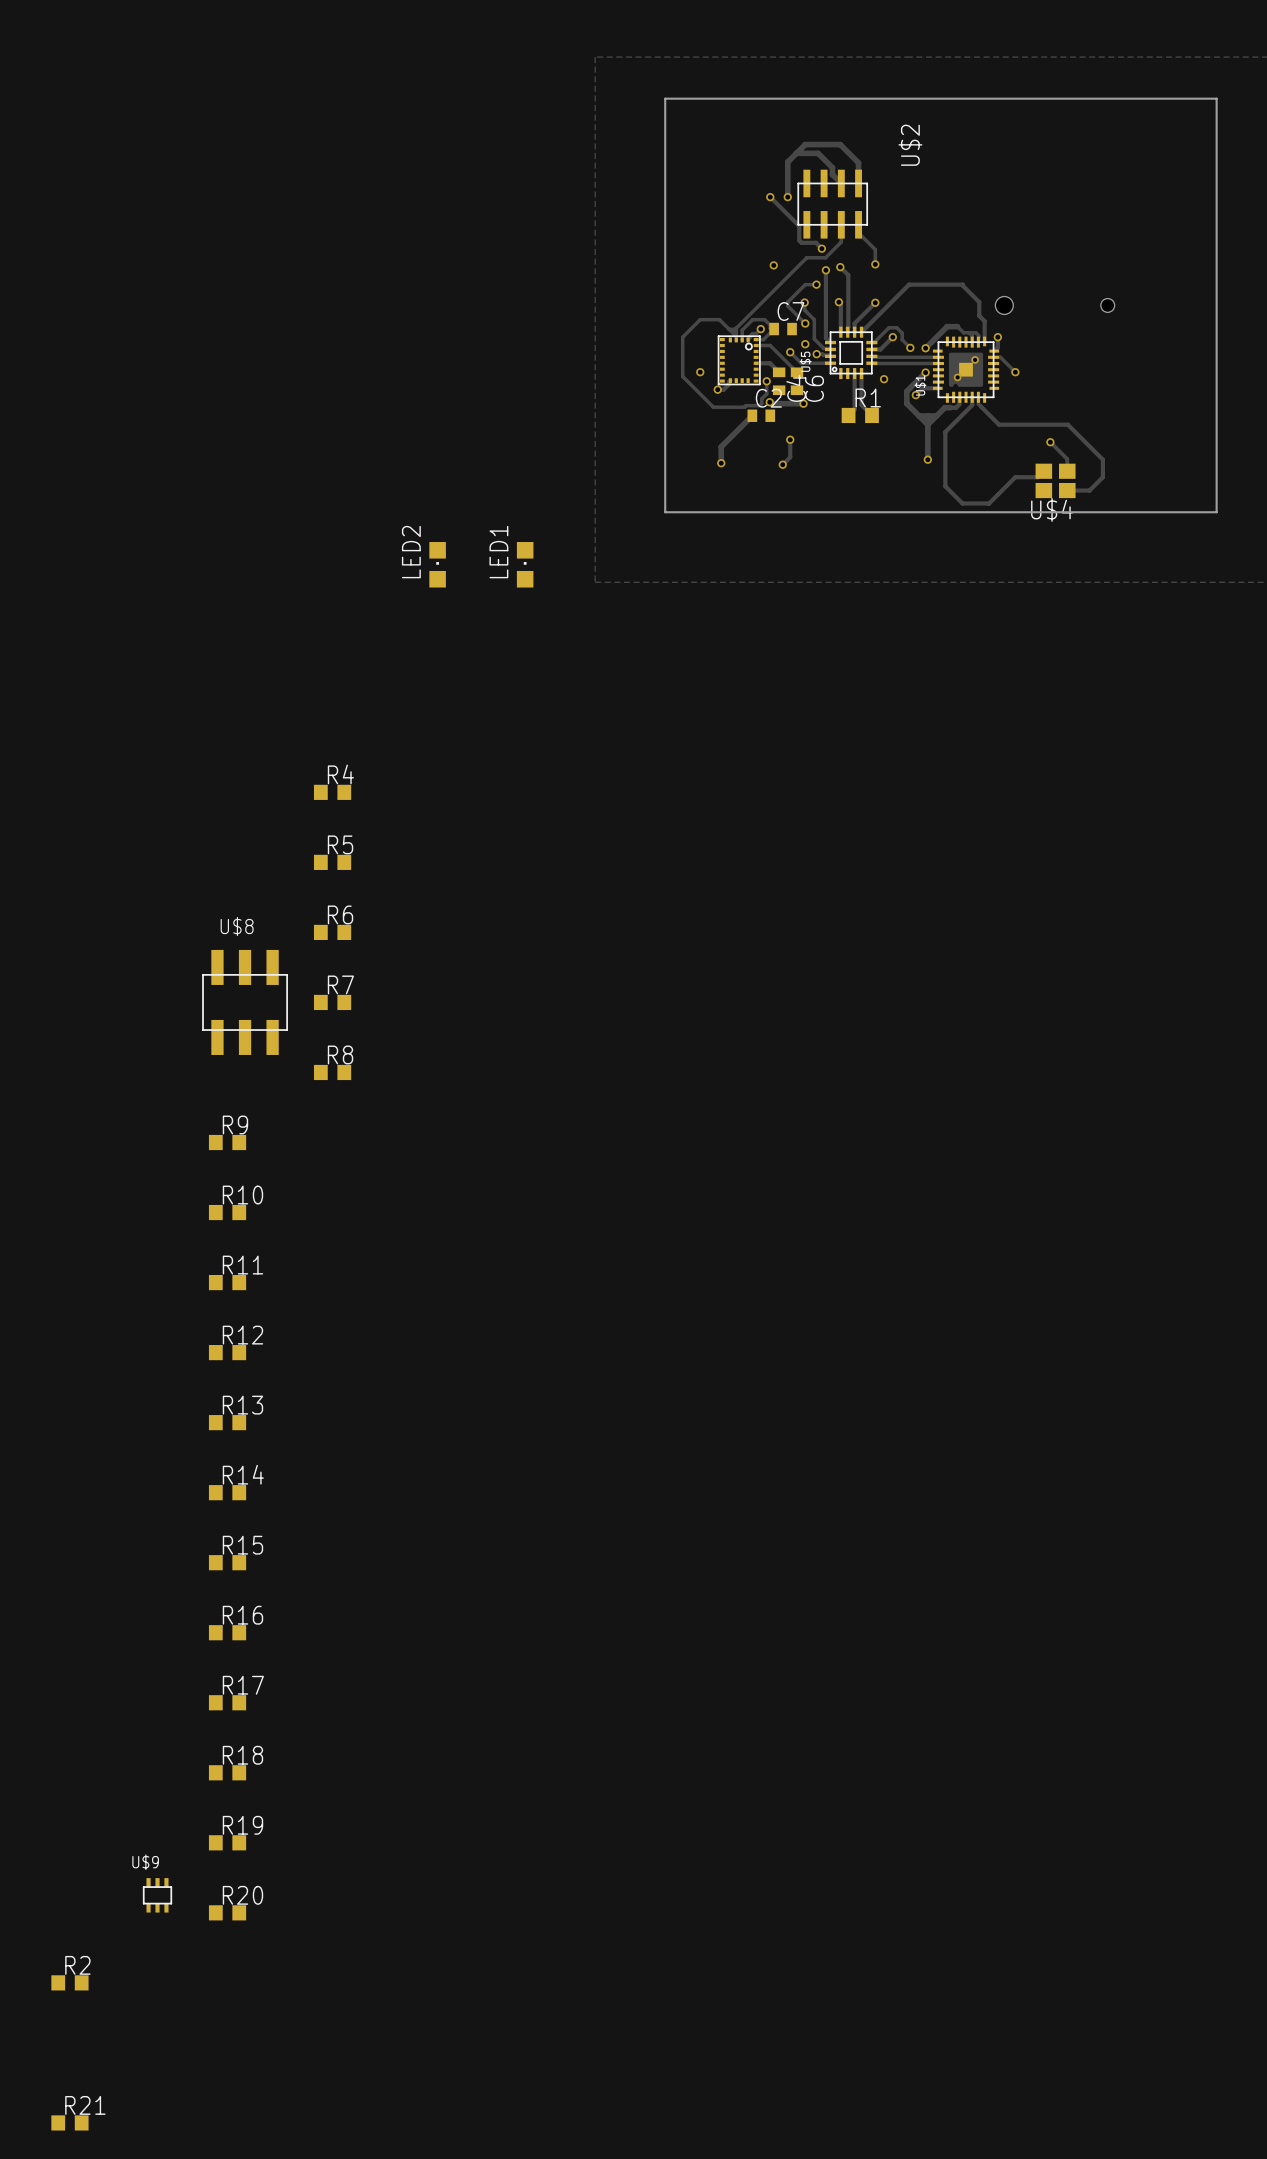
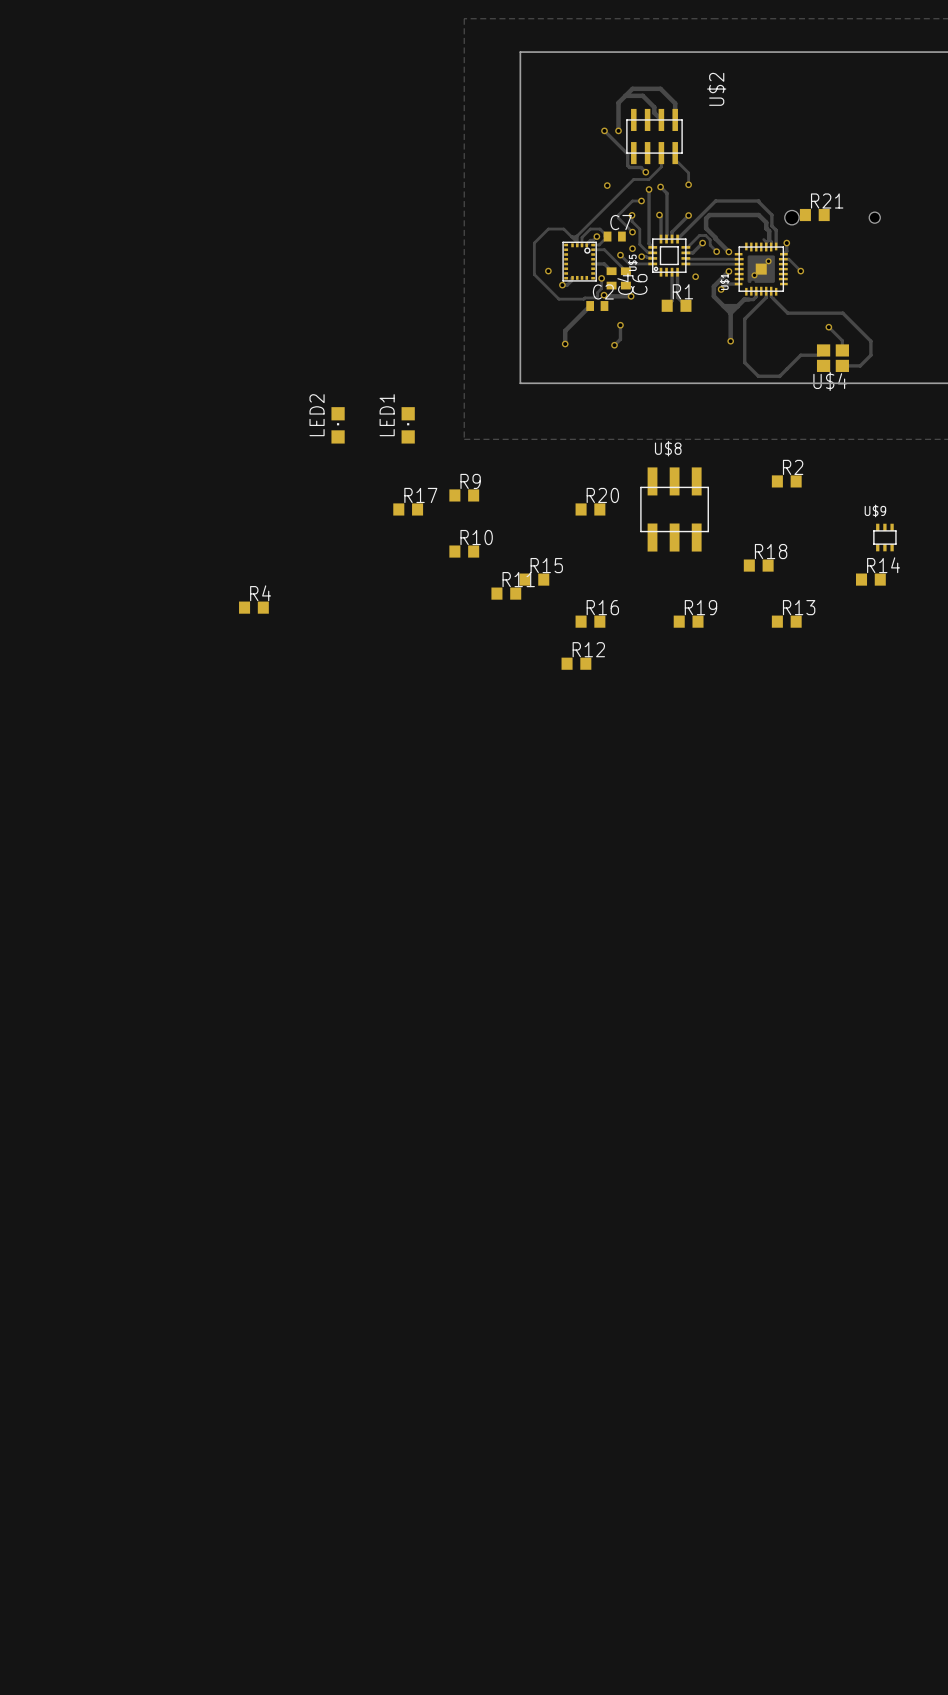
track: (957, 326) (947, 326) (925, 348) -> (766, 243) (769, 240) (769, 231) (766, 228) (766, 222) (758, 215) (709, 215) (706, 218) (706, 228) (728, 251)
track: (957, 326) (963, 332) (975, 332) -> none
R5: (332, 862) -> none
R6: (332, 932) -> none
U$8 position: (245, 1002) -> (674, 509)
R7: (332, 1002) -> none
R8: (332, 1072) -> none
R9 position: (227, 1142) -> (464, 495)
R10 position: (227, 1212) -> (464, 551)
R11 position: (227, 1282) -> (506, 593)
R12 position: (227, 1352) -> (576, 663)
R13 position: (227, 1422) -> (786, 621)
R14 position: (227, 1492) -> (870, 579)
R15 position: (227, 1562) -> (534, 579)
R16 position: (227, 1632) -> (590, 621)
R17 position: (227, 1702) -> (408, 509)
R18 position: (227, 1772) -> (758, 565)
R19 position: (227, 1842) -> (688, 621)
U$9 position: (157, 1895) -> (884, 537)
R20 position: (227, 1912) -> (590, 509)
R2 position: (69, 1982) -> (786, 481)
R21 position: (69, 2122) -> (814, 215)

